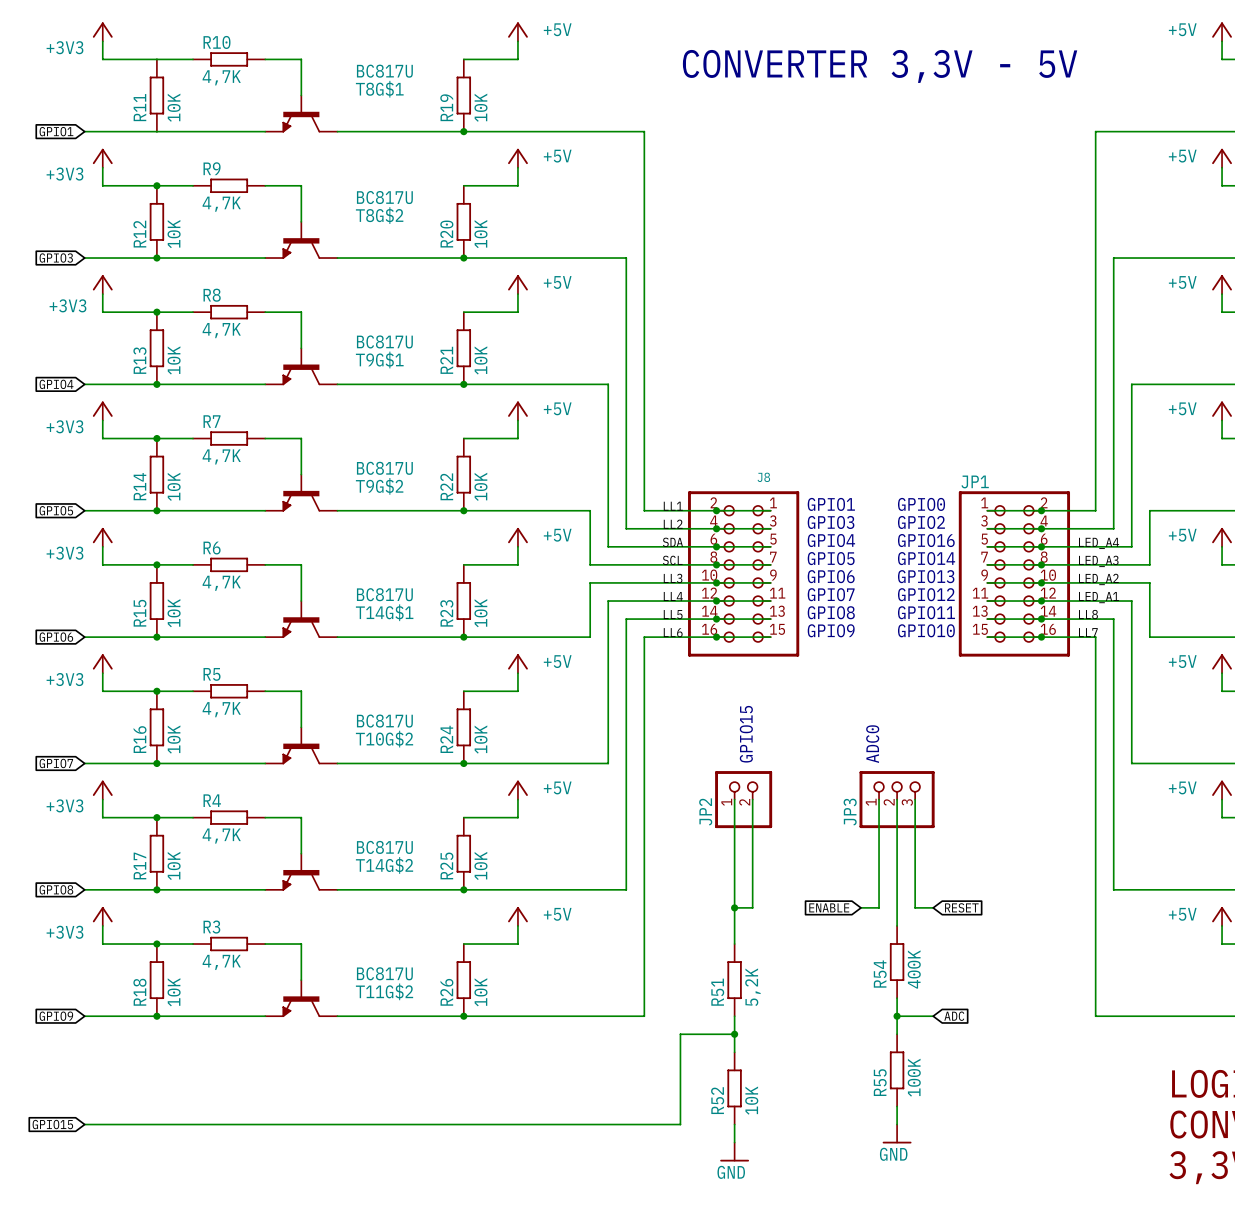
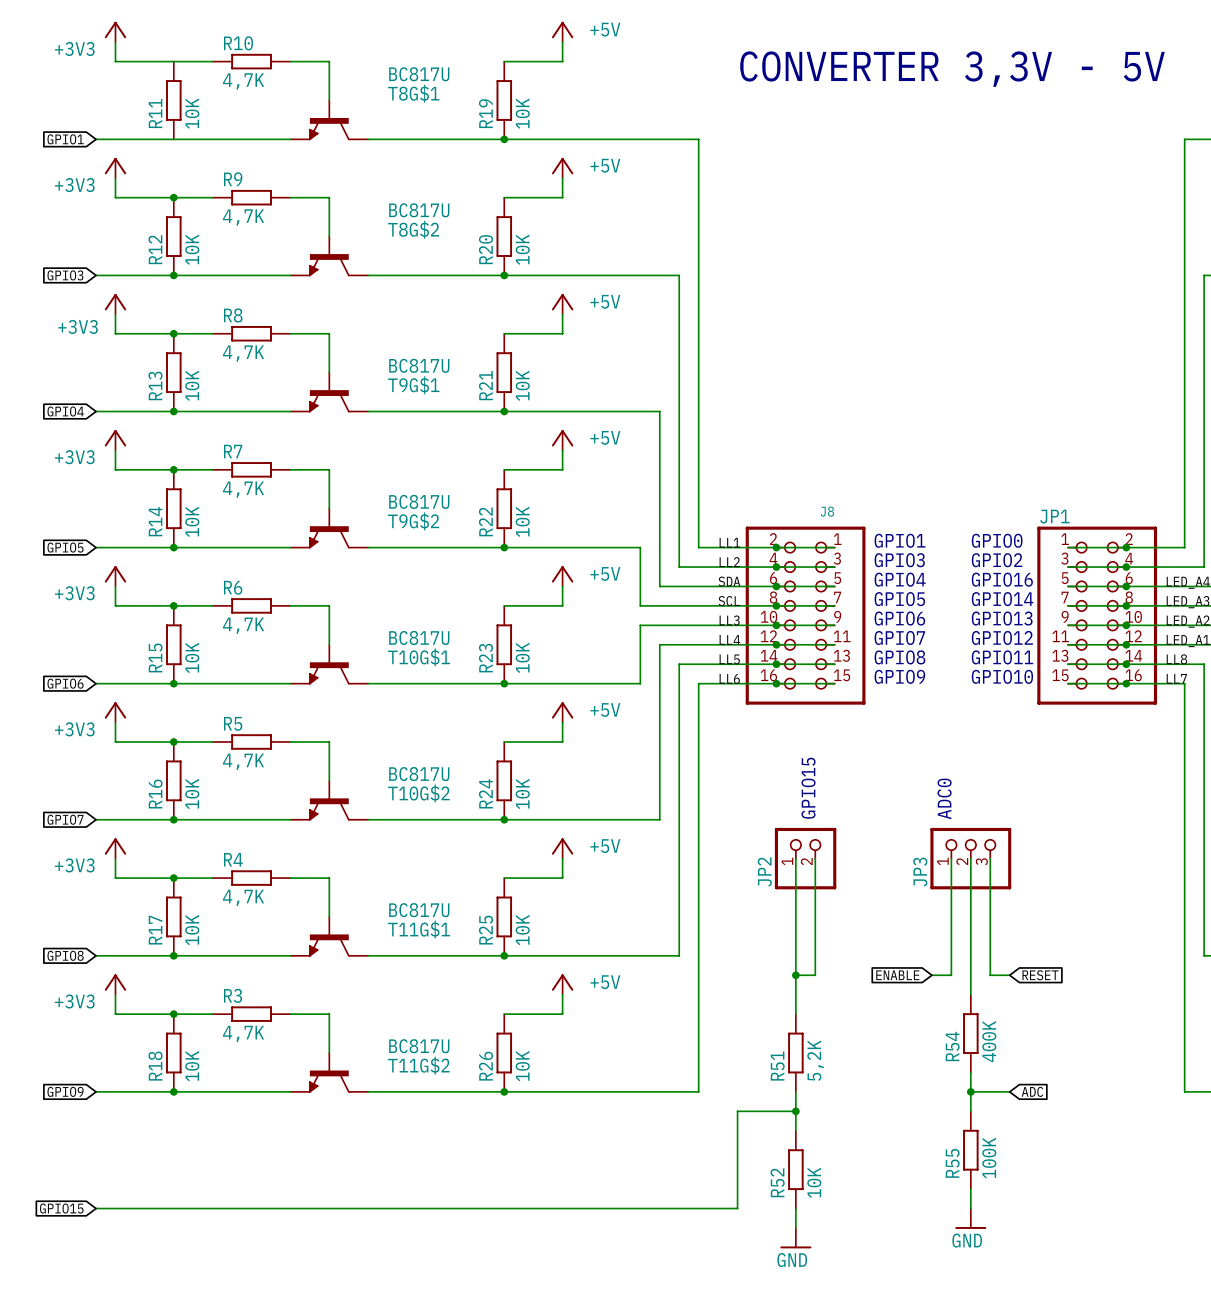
T14G$1 name: T14G$1 (384, 612) -> T10G$1 (419, 657)
T14G$2 name: T14G$2 (384, 865) -> T11G$1 (419, 929)

